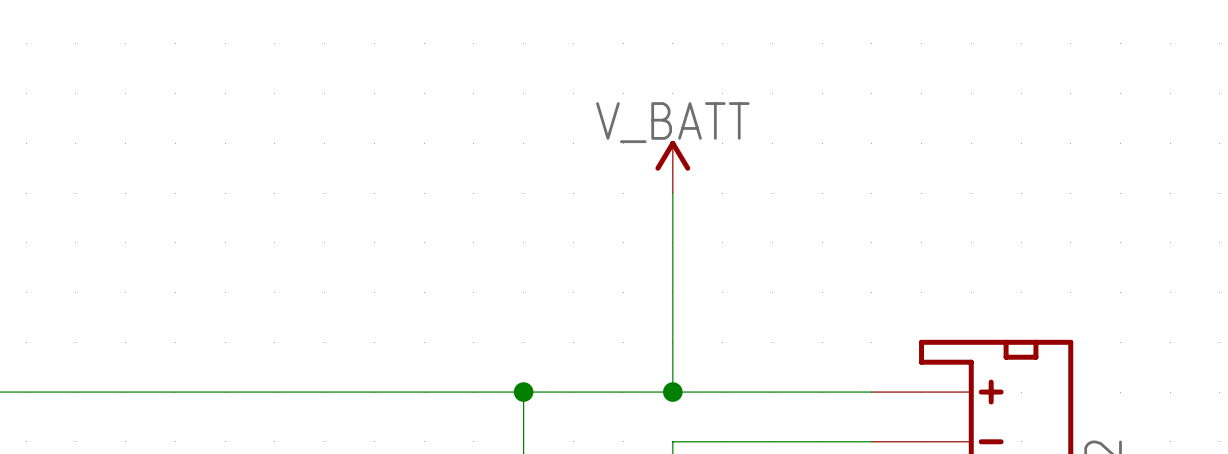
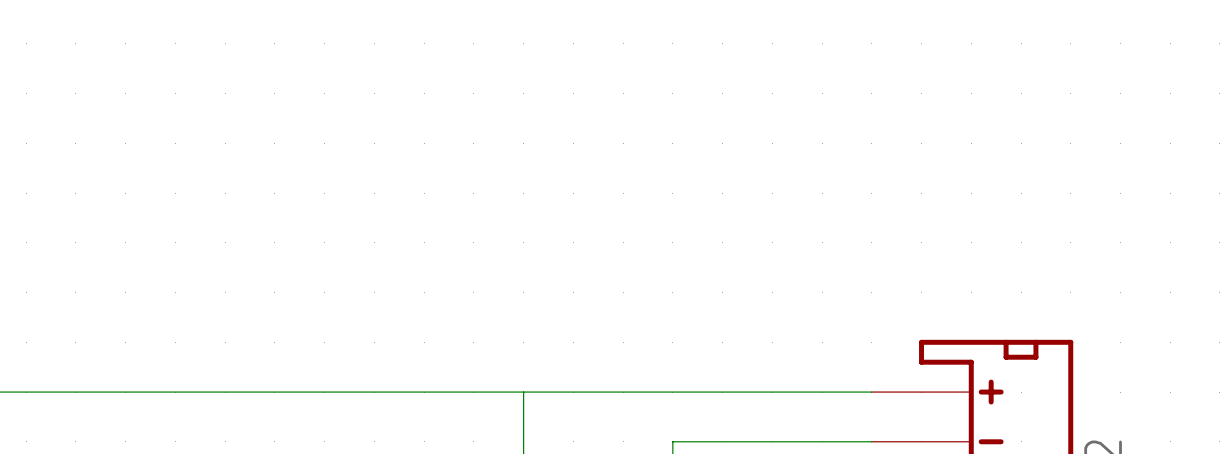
power symbol: V_BATT (672, 166) -> none
wire: (672, 193) (672, 392) -> none
junction: (523, 392) -> none
junction: (672, 392) -> none

